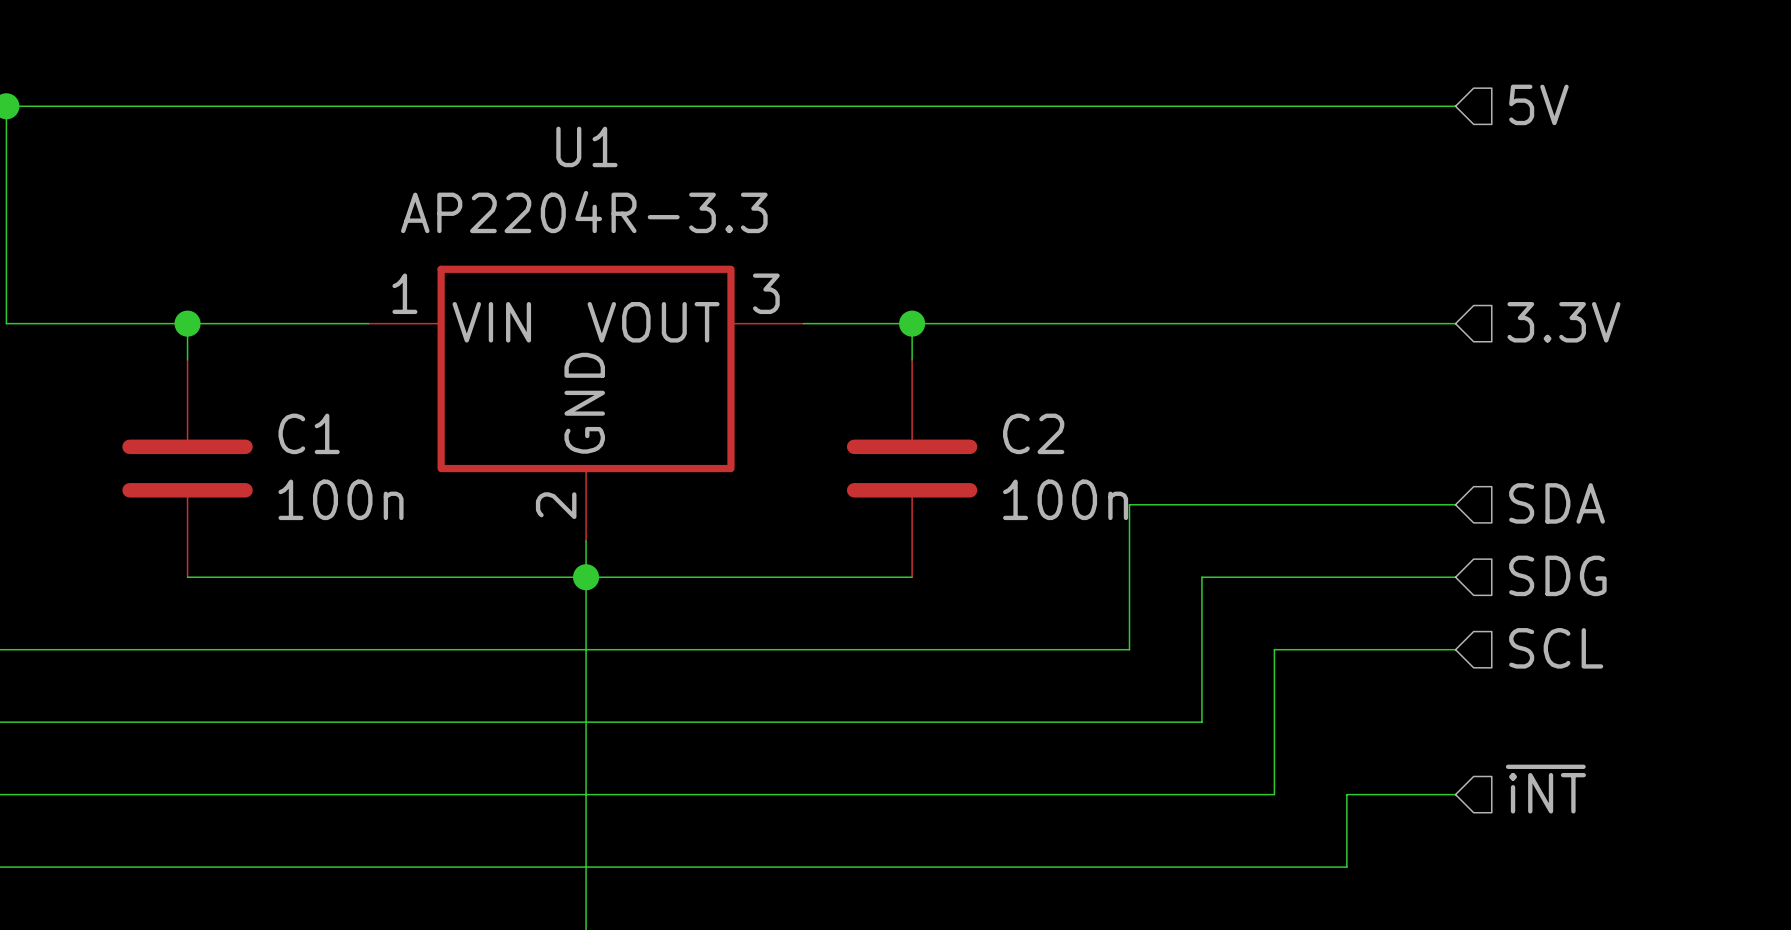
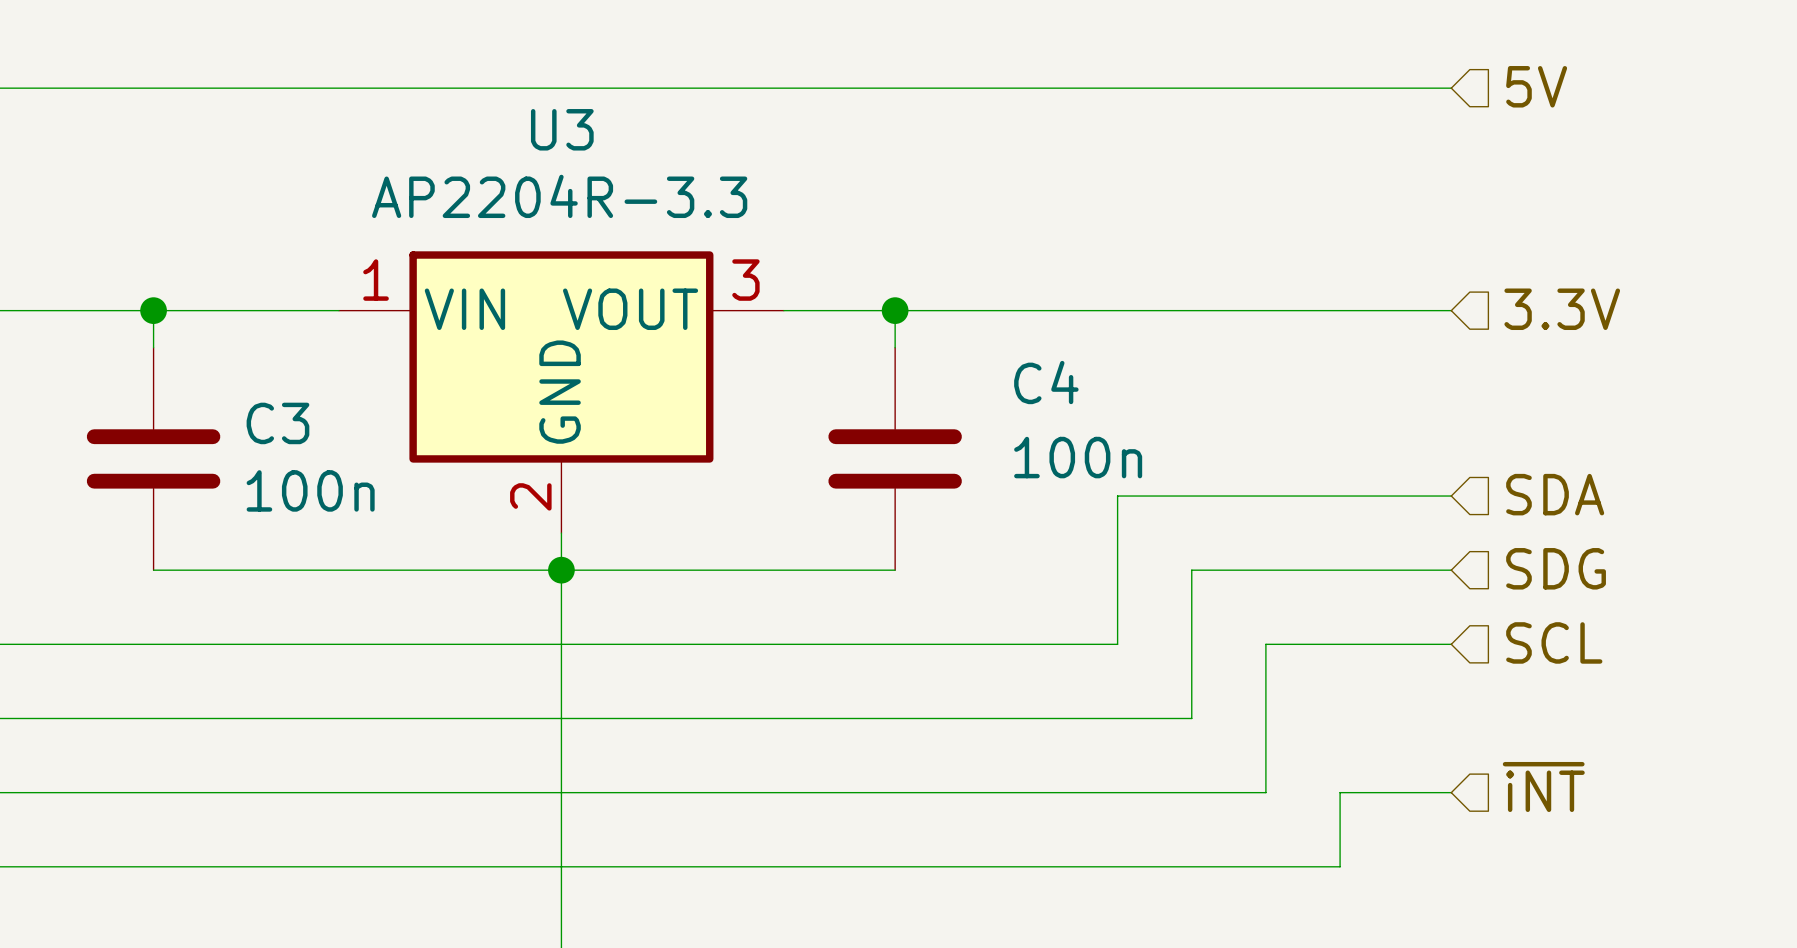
U1 name: U1 (586, 146) -> U3 (562, 129)
C1 name: C1 (309, 433) -> C3 (277, 423)
C2 name: C2 (1033, 433) -> C4 (1046, 382)
C2 value position: 100n (1065, 499) -> 100n (1078, 457)

